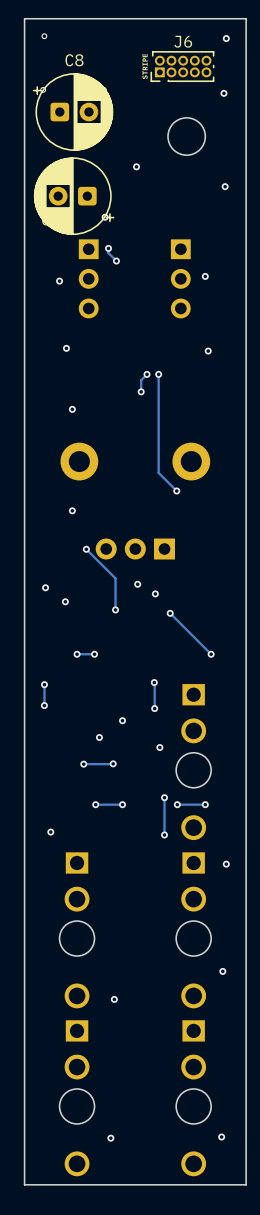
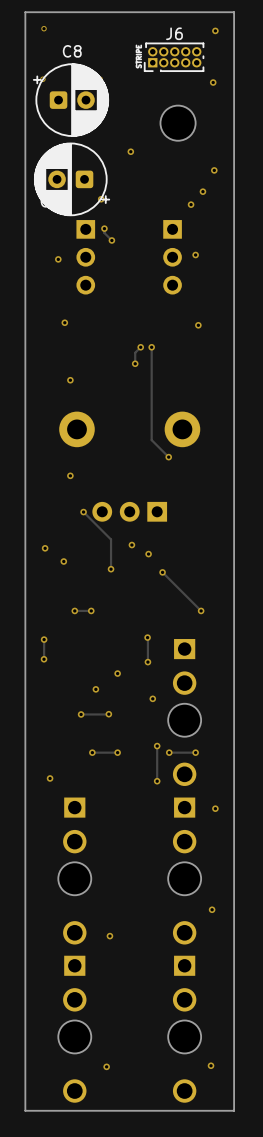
via: none -> (202, 191)
via: none -> (191, 204)

